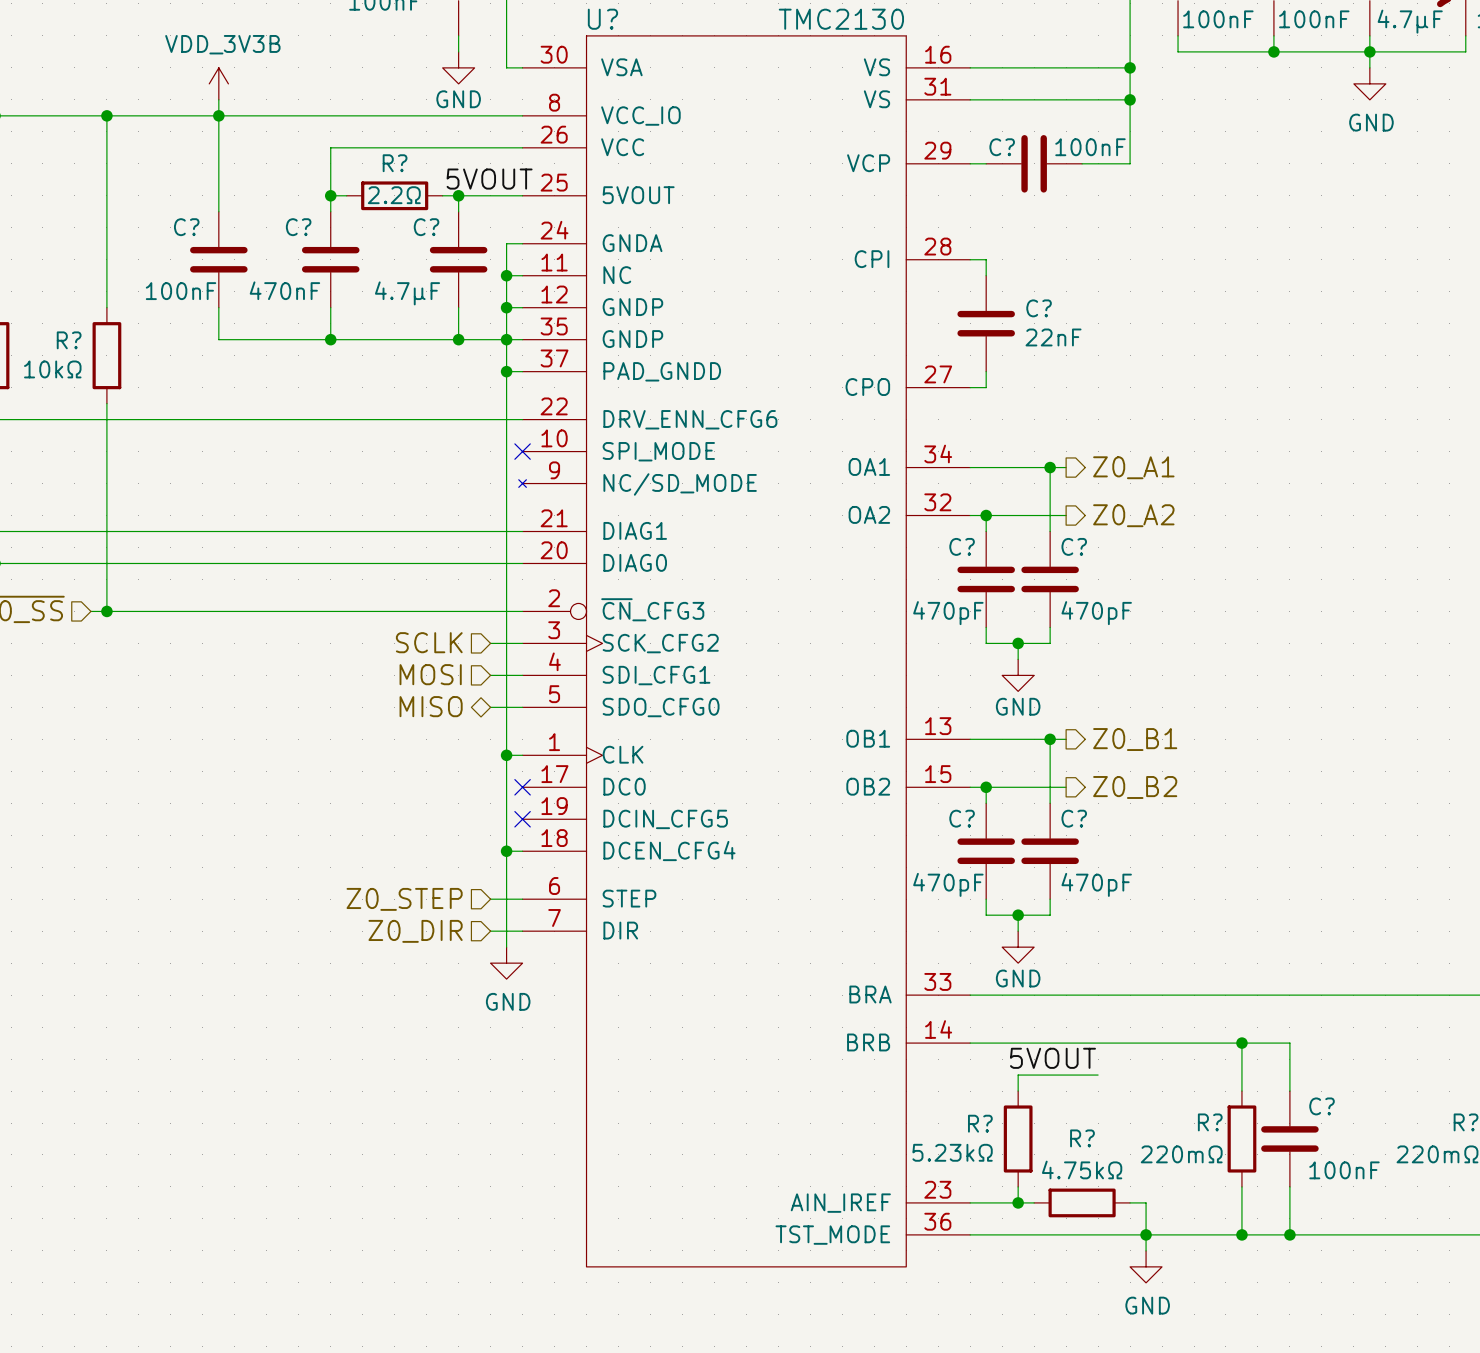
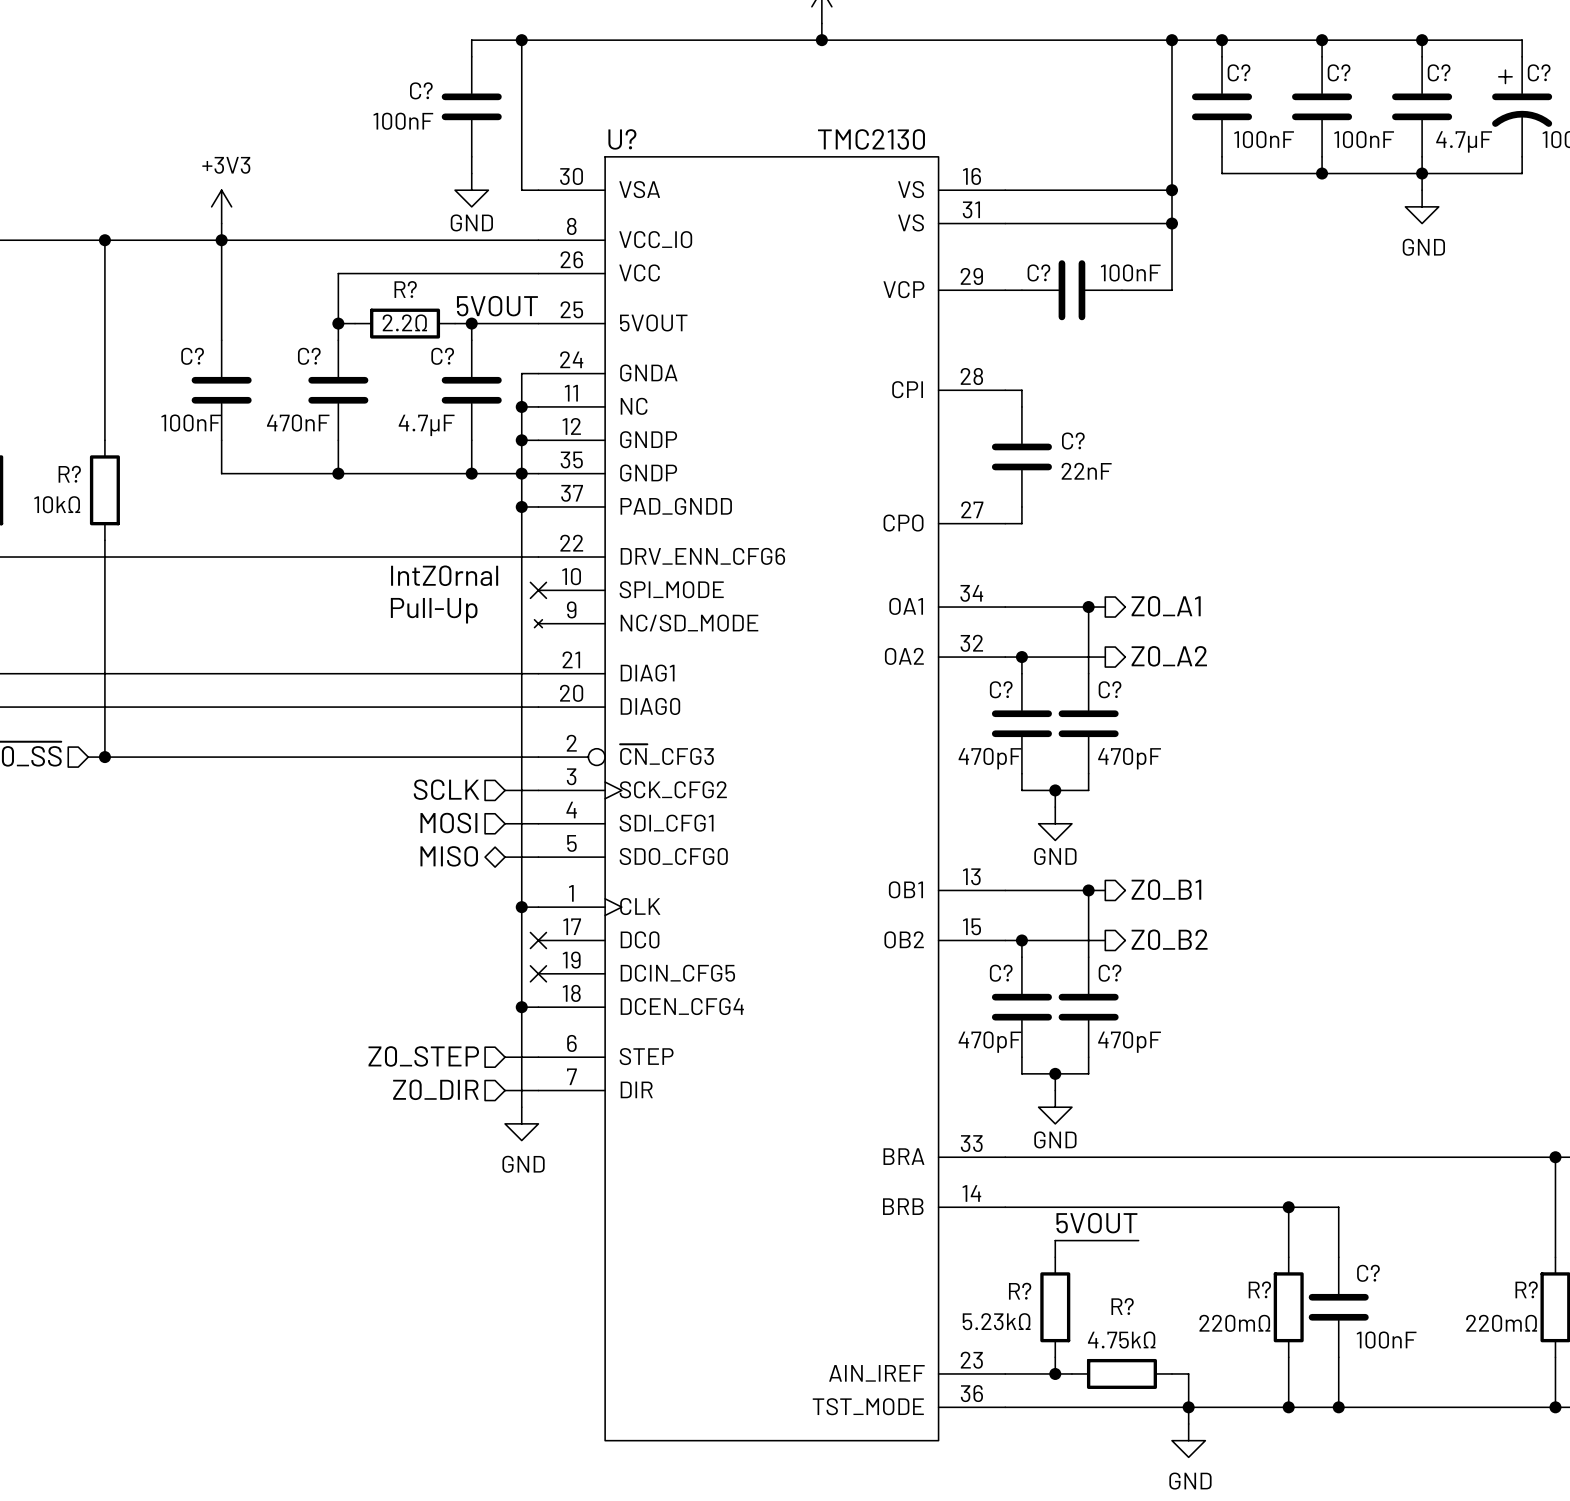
power symbol: VDD_3V3B (218, 83) -> +3V3 (221, 206)
text: none -> IntZ0rnal (444, 575)
text: none -> Pull-Up (434, 610)

